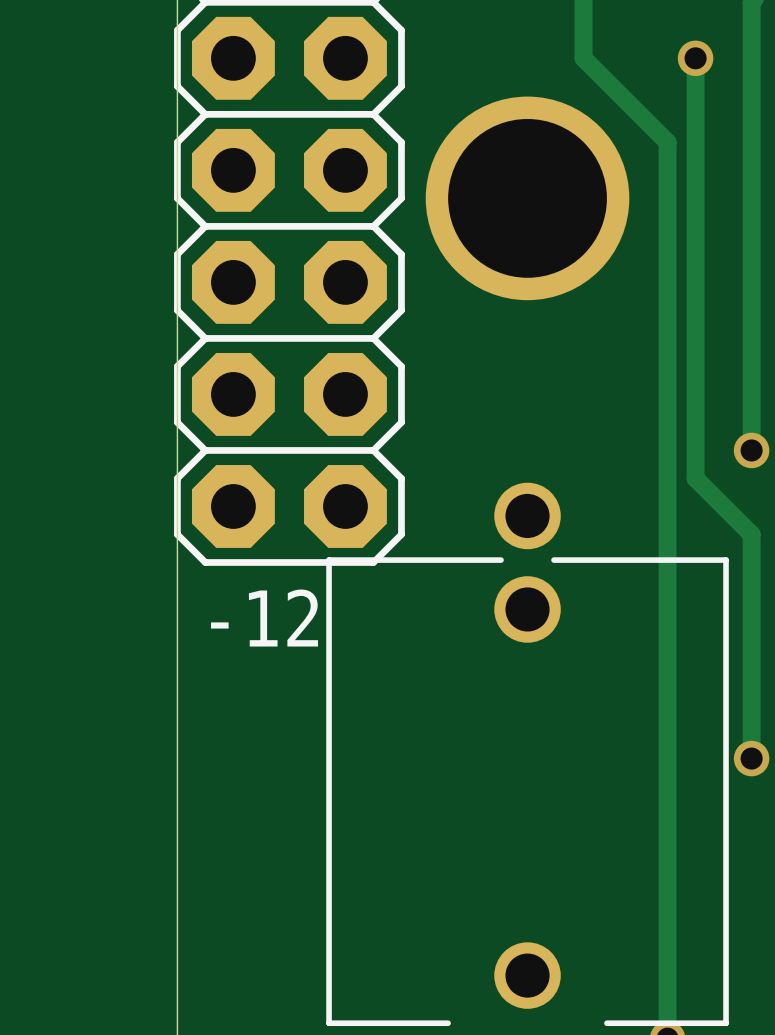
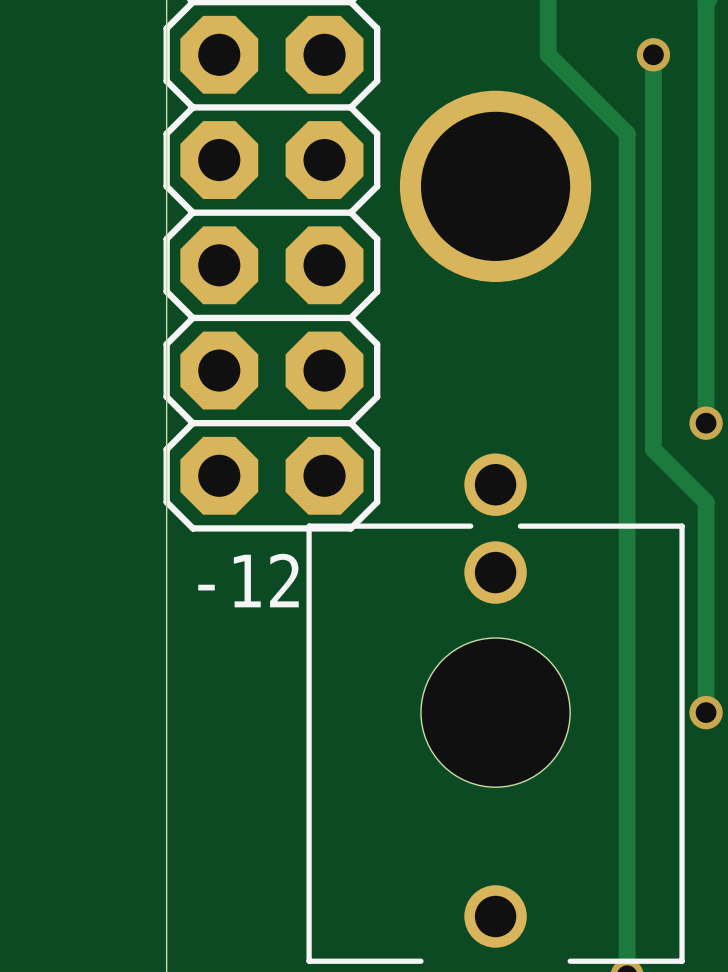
part footprint: [326, 482, 729, 1027] -> [306, 453, 685, 964]

